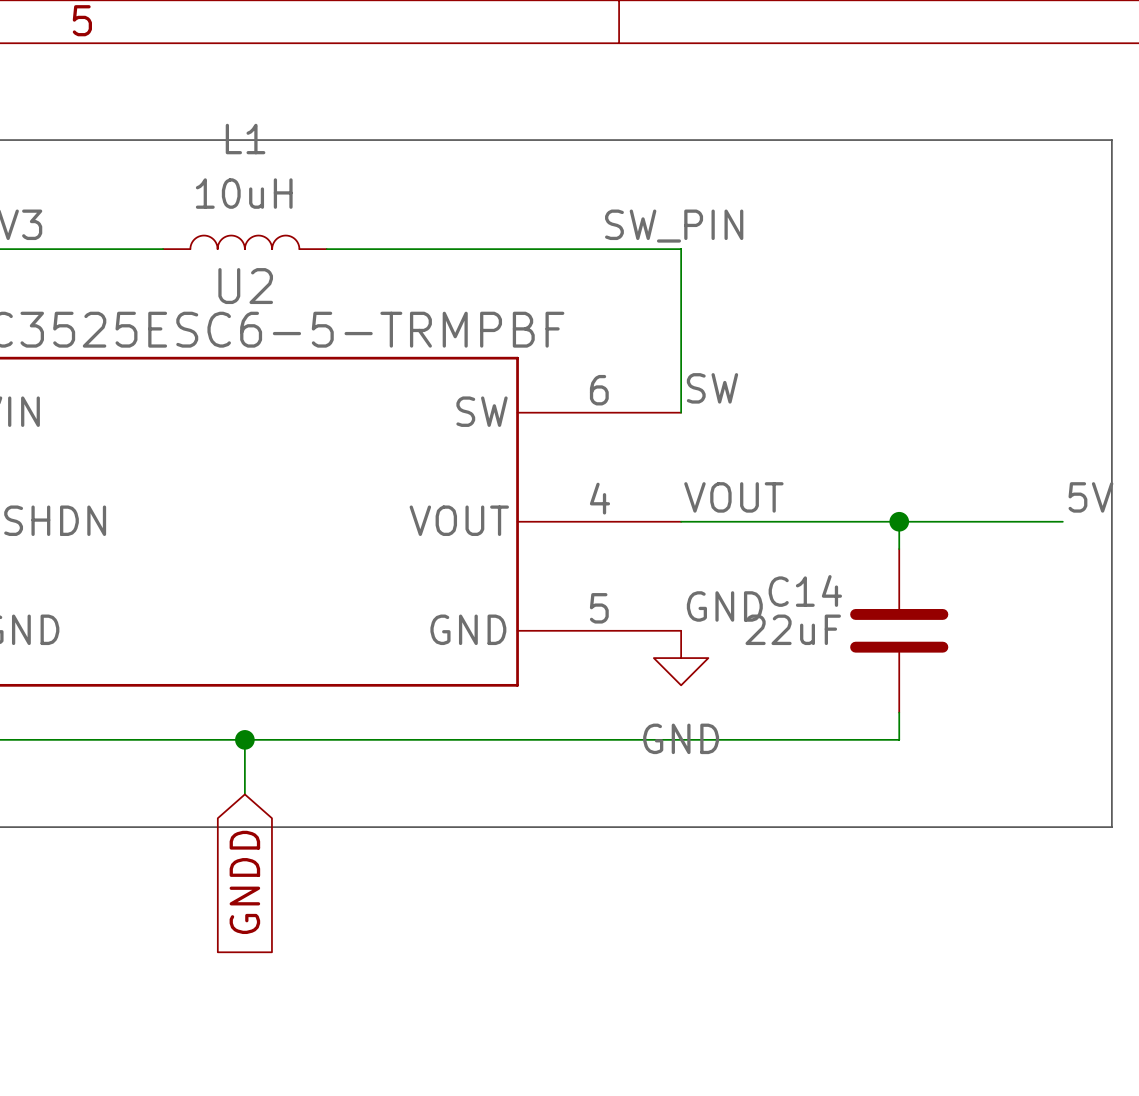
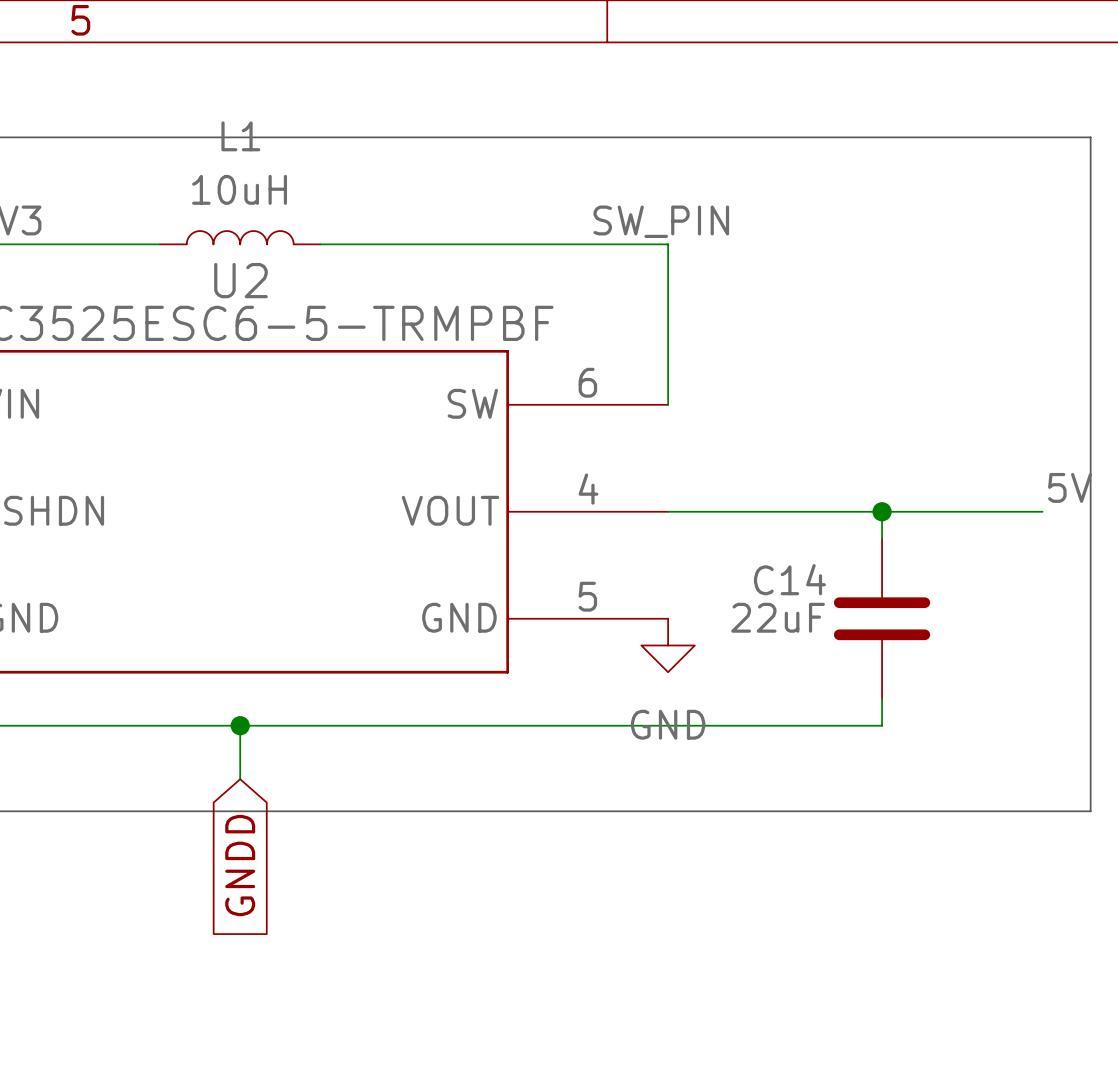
label: SW (712, 388) -> none
label: VOUT (733, 497) -> none
label: GND (724, 606) -> none

